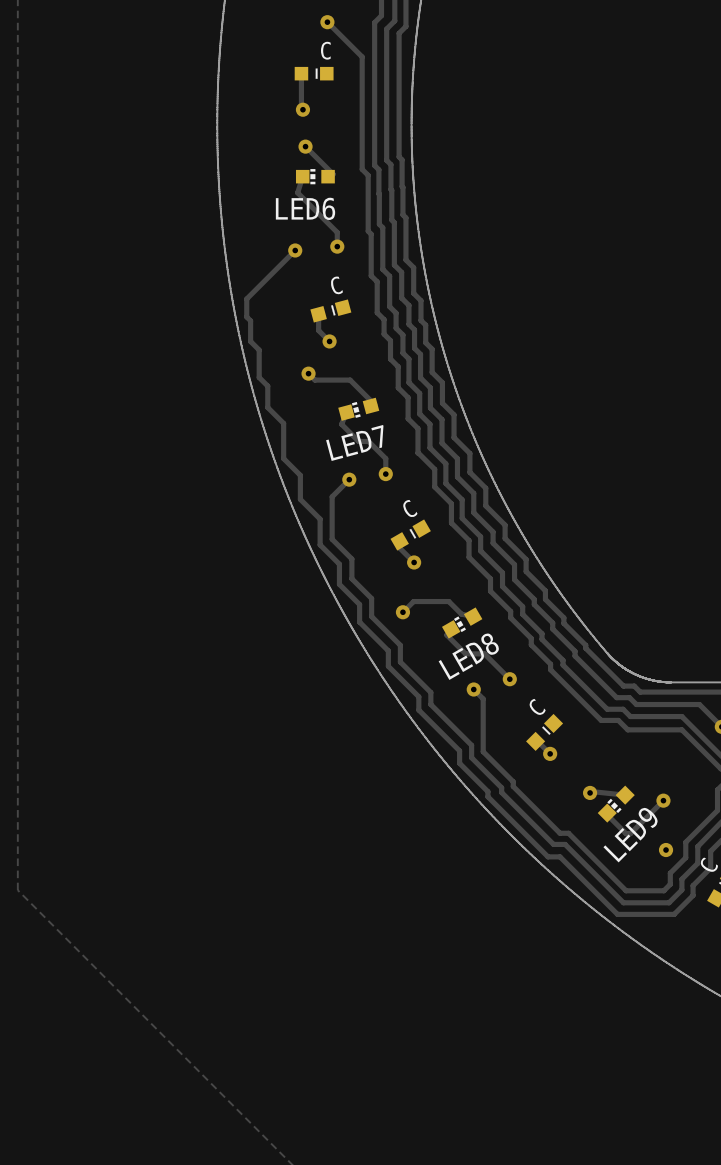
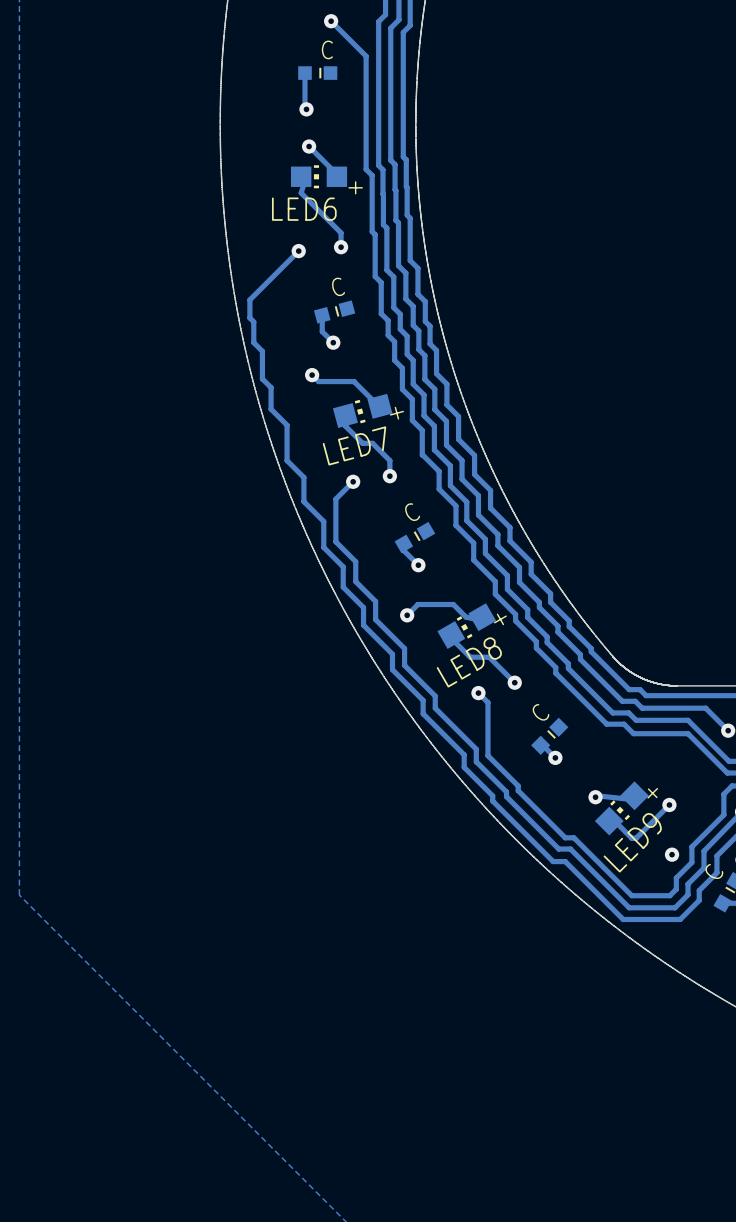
LED6 footprint: [295, 169, 335, 185] -> [290, 165, 348, 189]
LED7 footprint: [338, 397, 380, 421] -> [332, 393, 393, 429]
LED8 footprint: [441, 607, 483, 639] -> [437, 603, 497, 649]
LED9 footprint: [597, 785, 635, 823] -> [594, 781, 649, 836]

